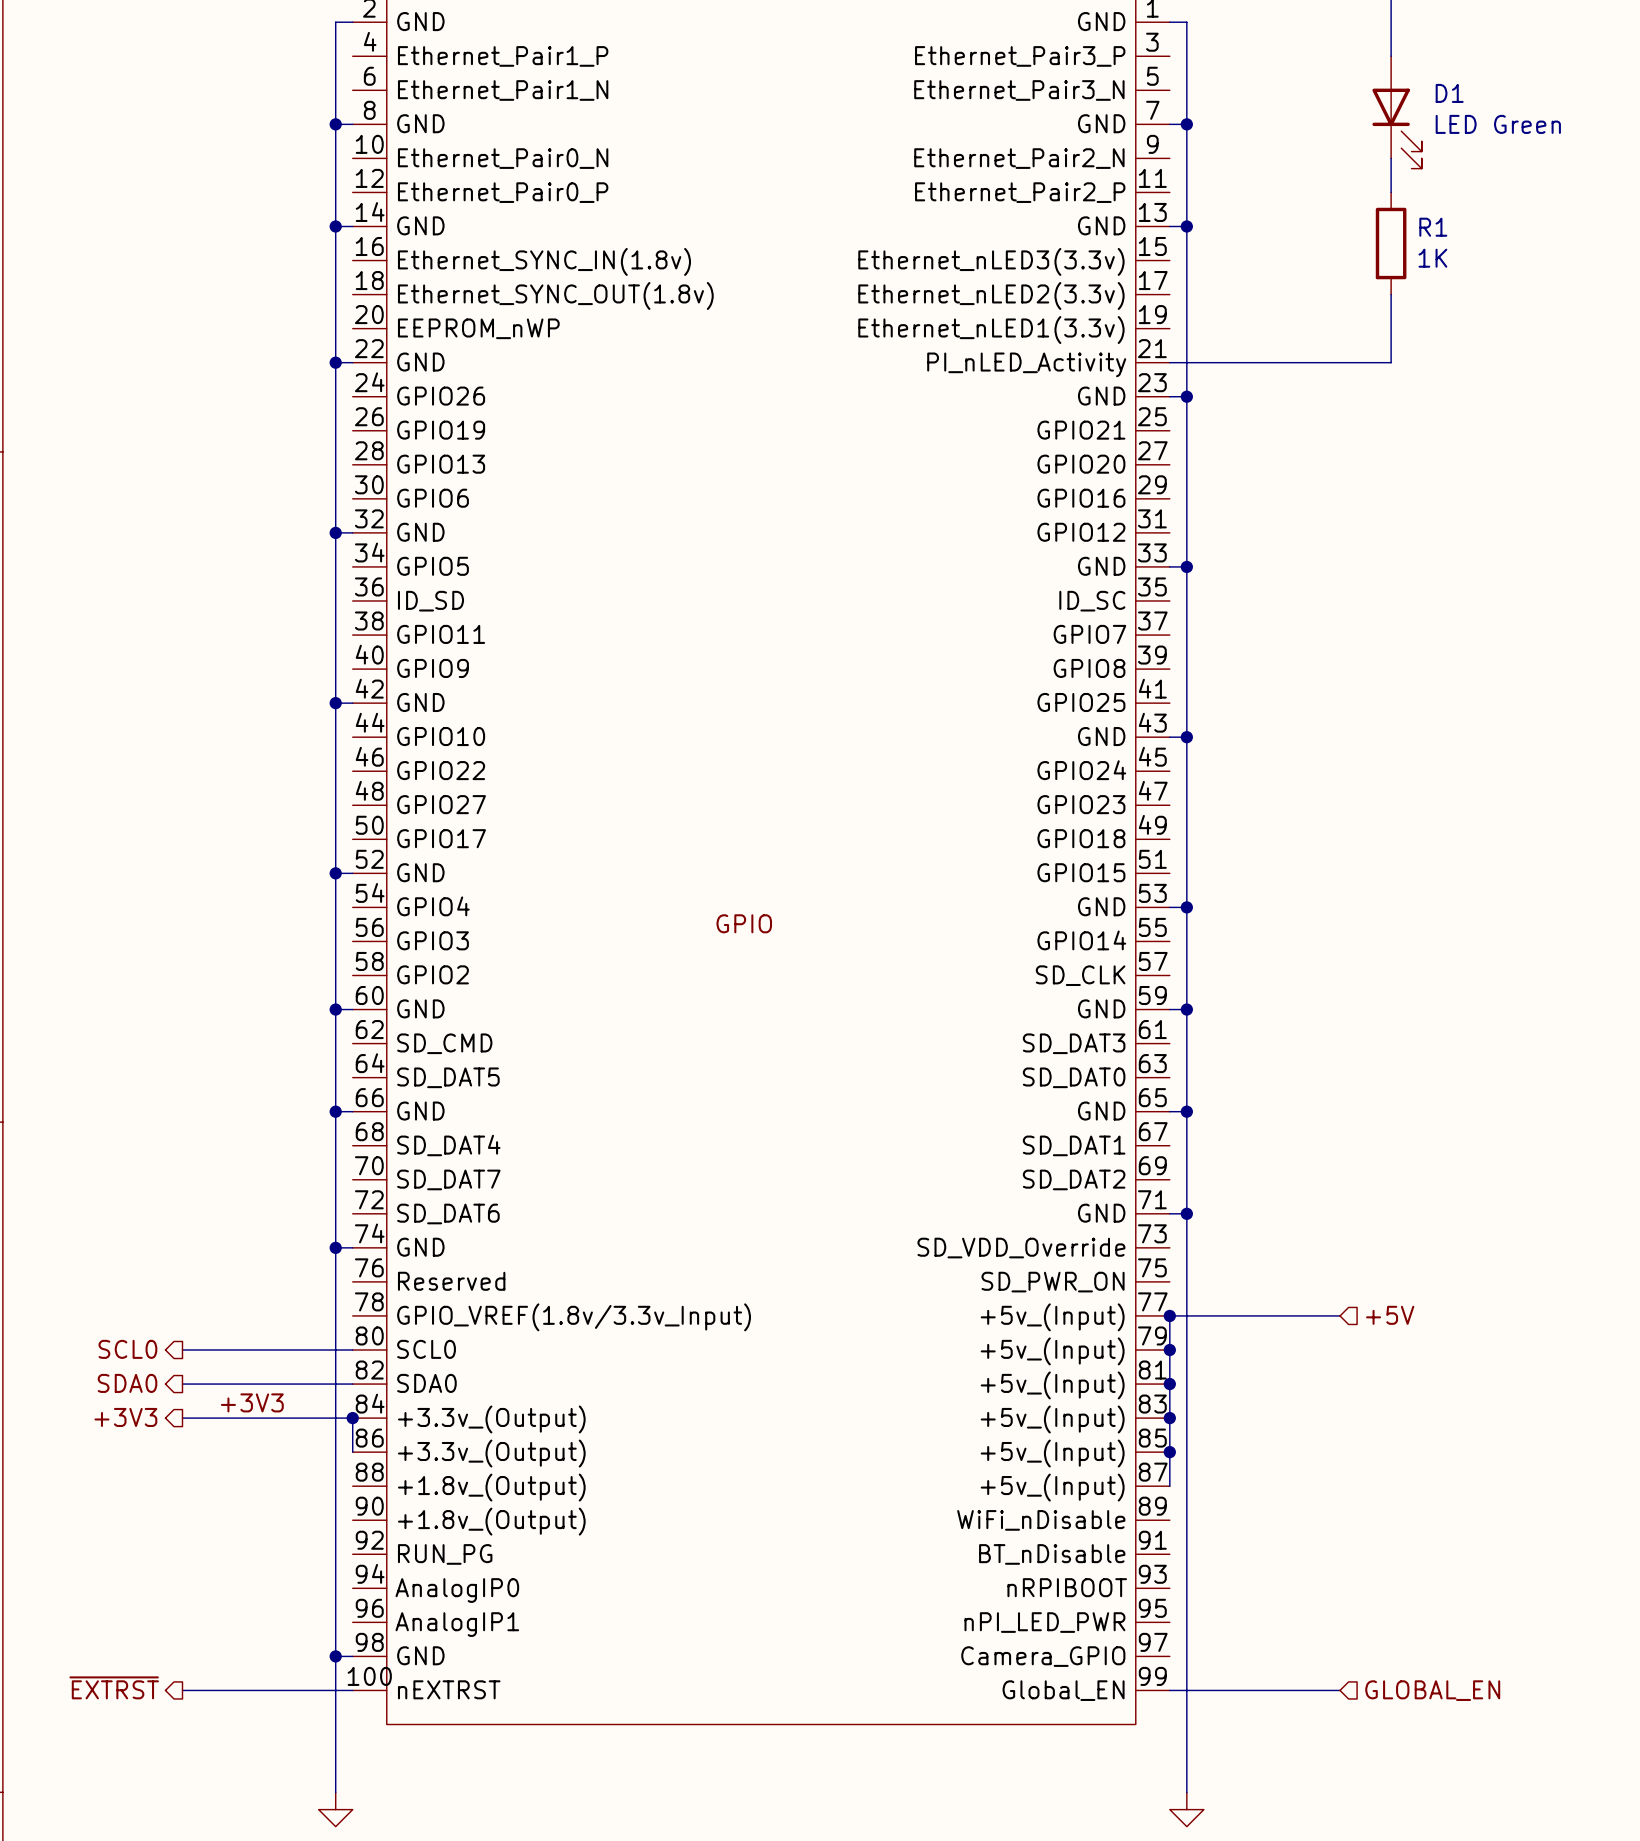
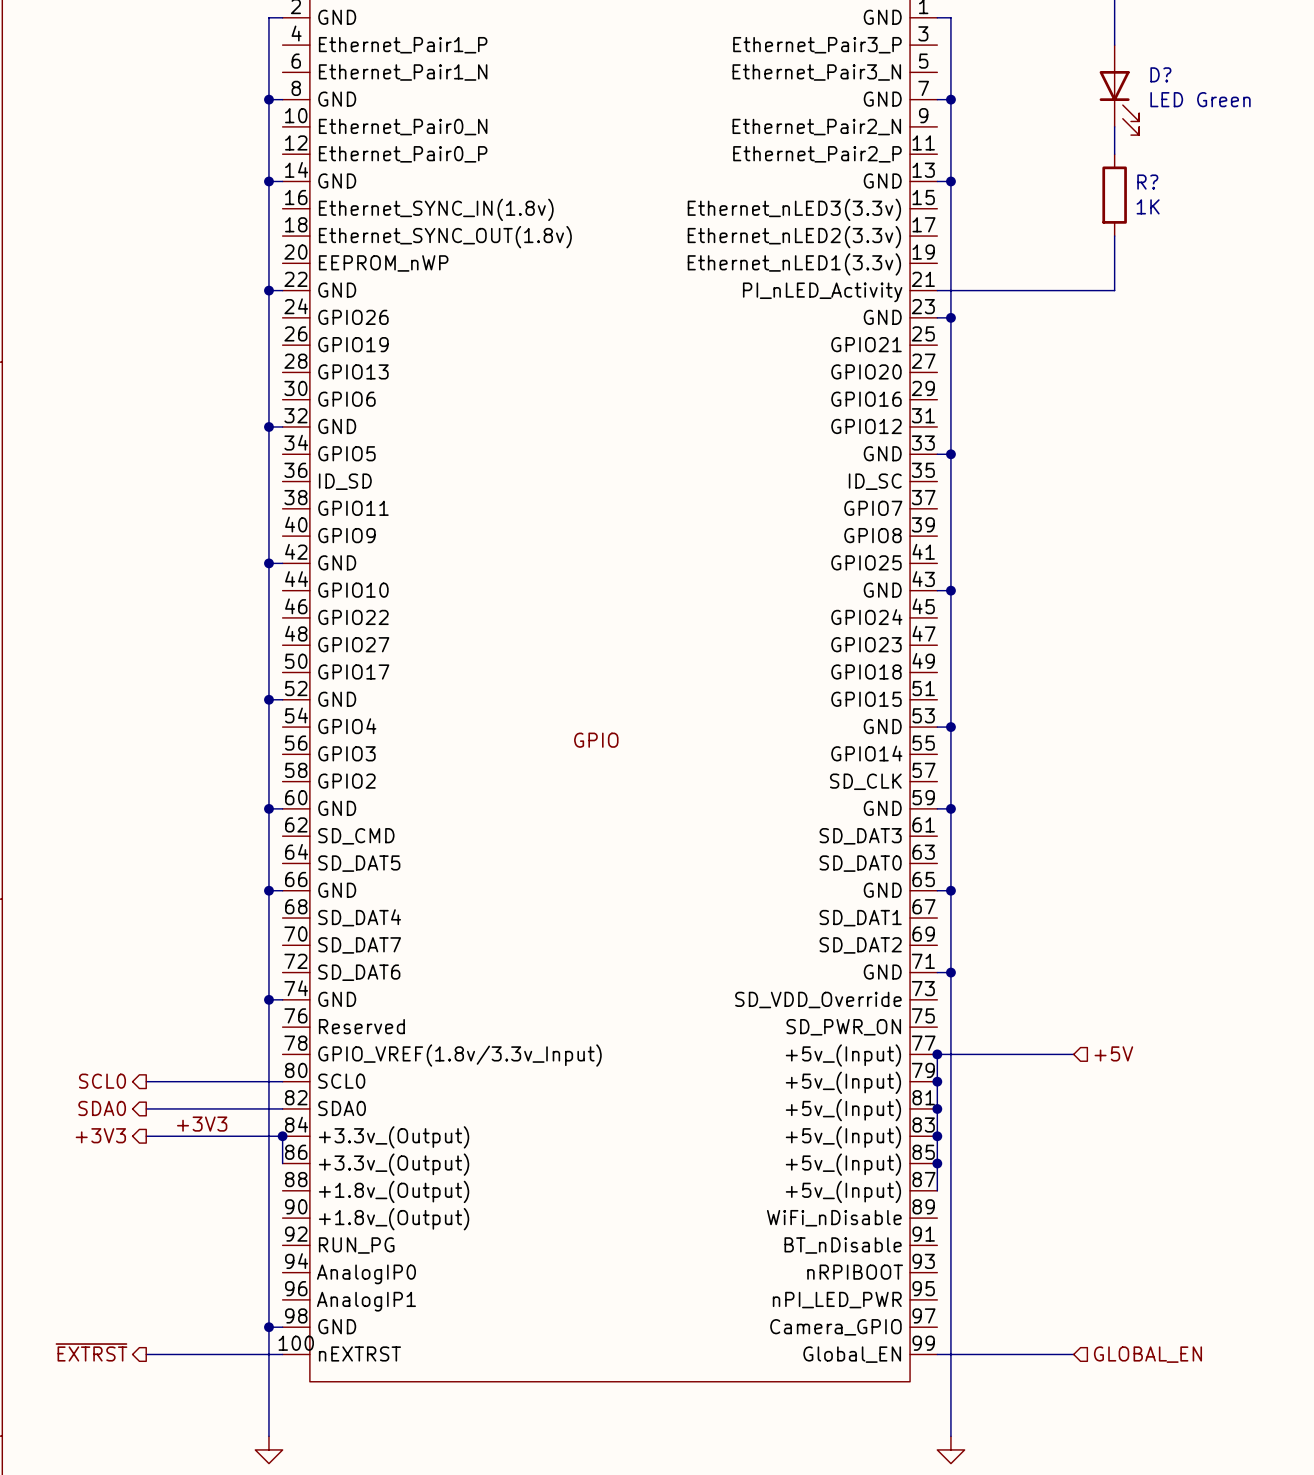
D1 name: D1 (1449, 93) -> D? (1160, 74)
R1 name: R1 (1433, 227) -> R? (1147, 182)

